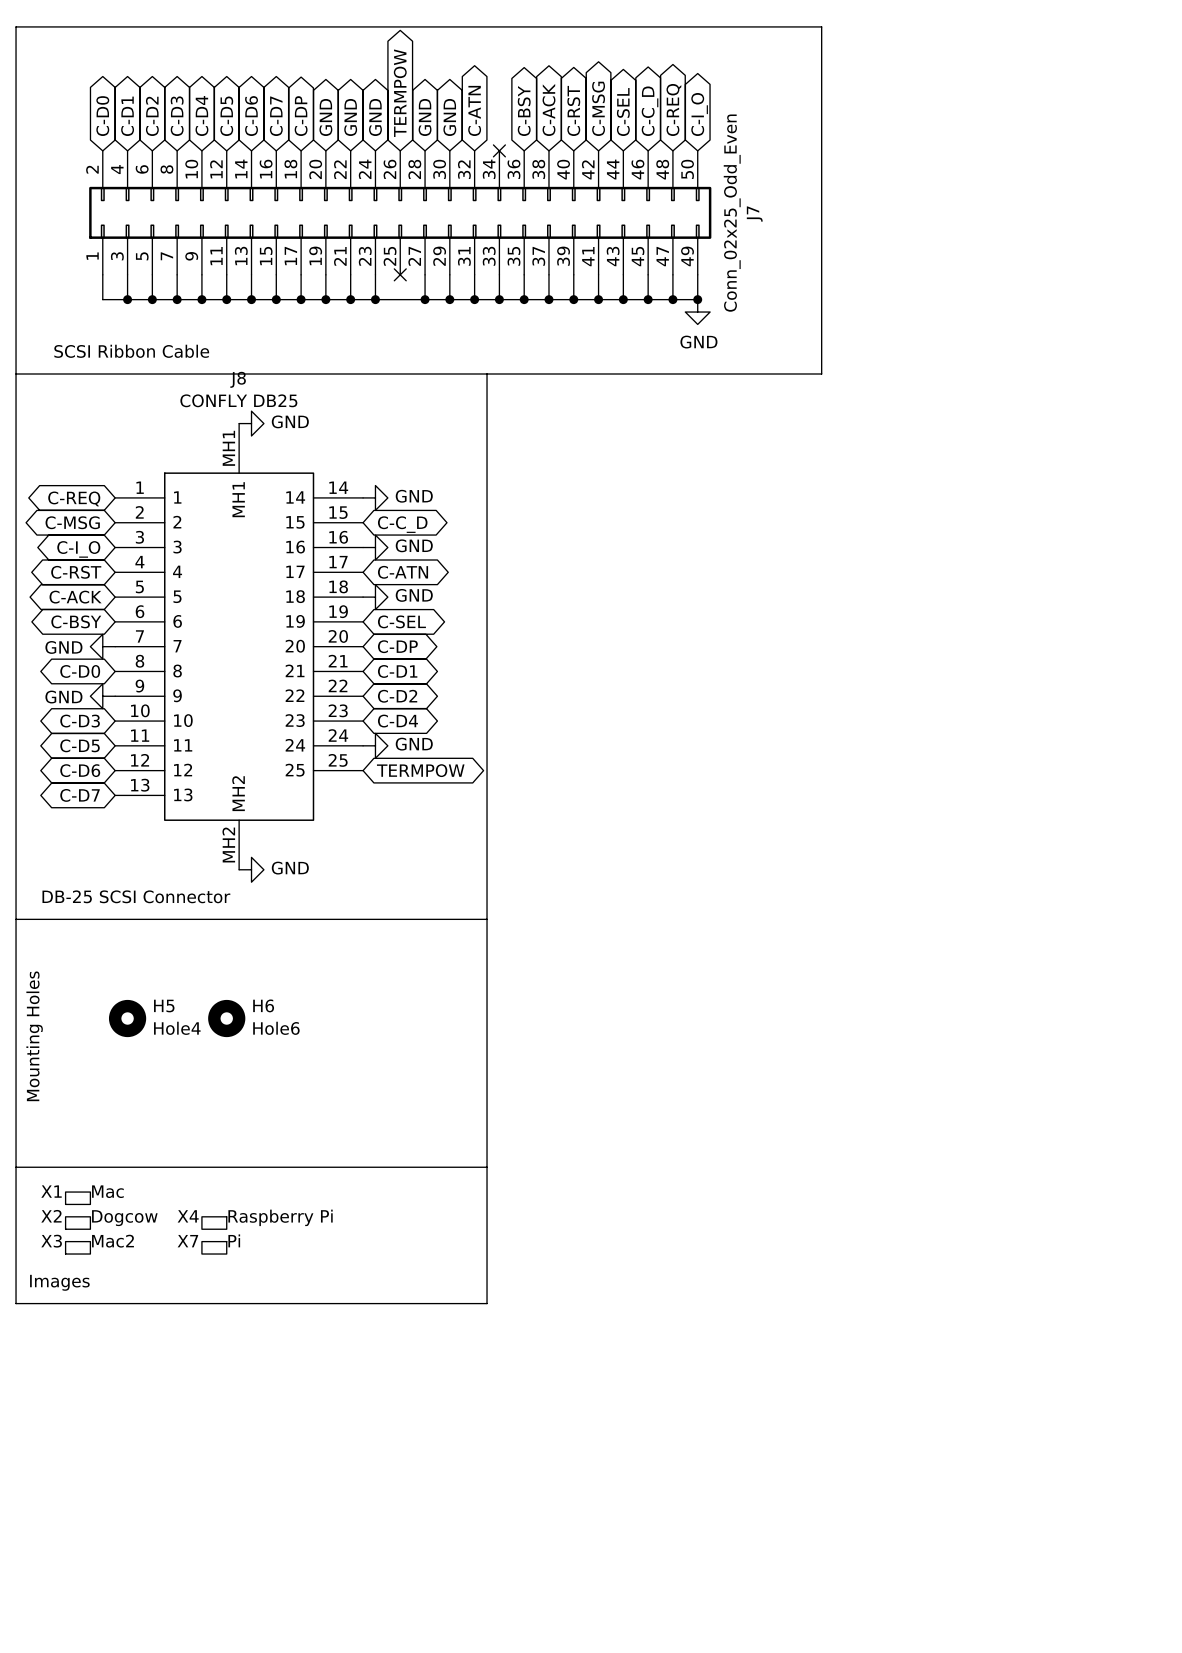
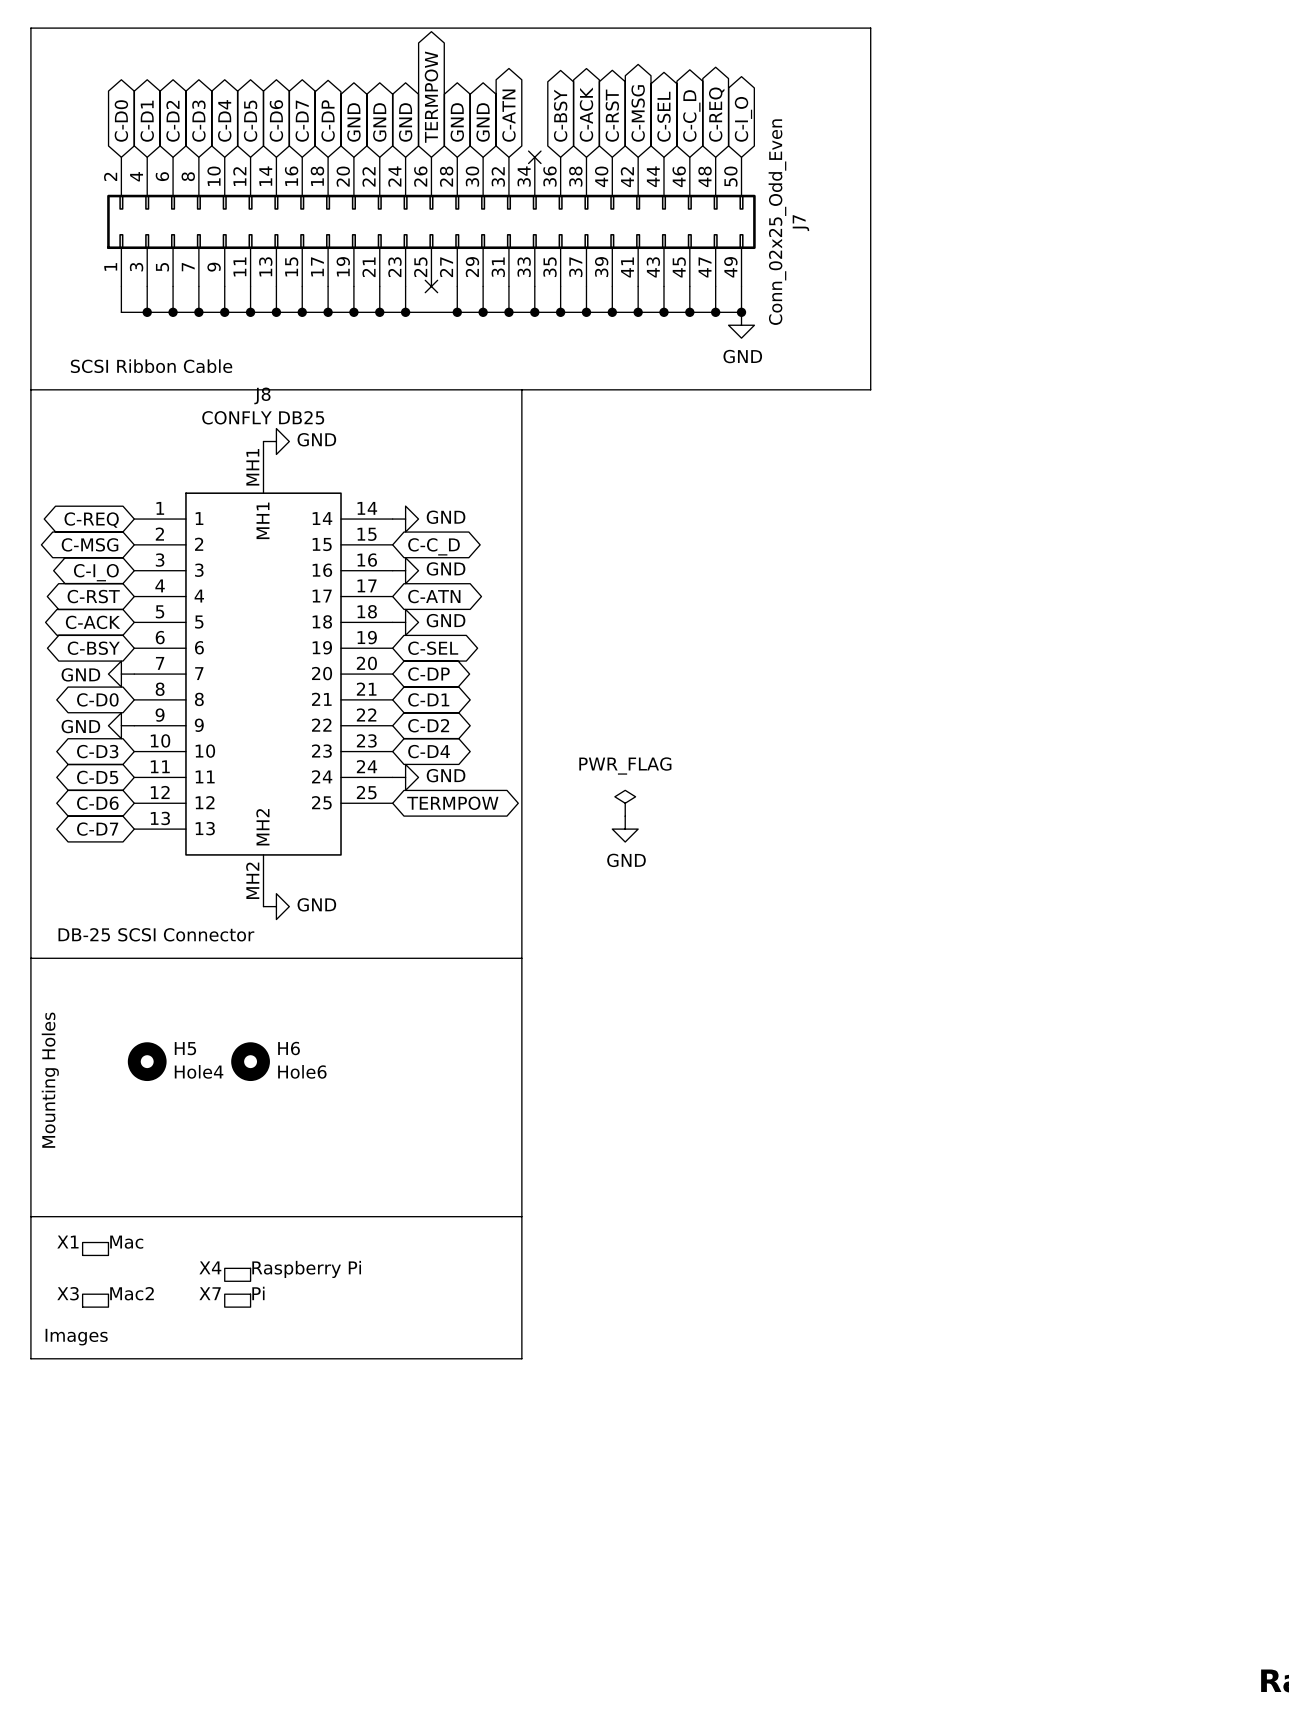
power symbol: none -> PWR_FLAG (625, 803)
power symbol: none -> GND (625, 829)
X2: Dogcow (77, 1223) -> none

